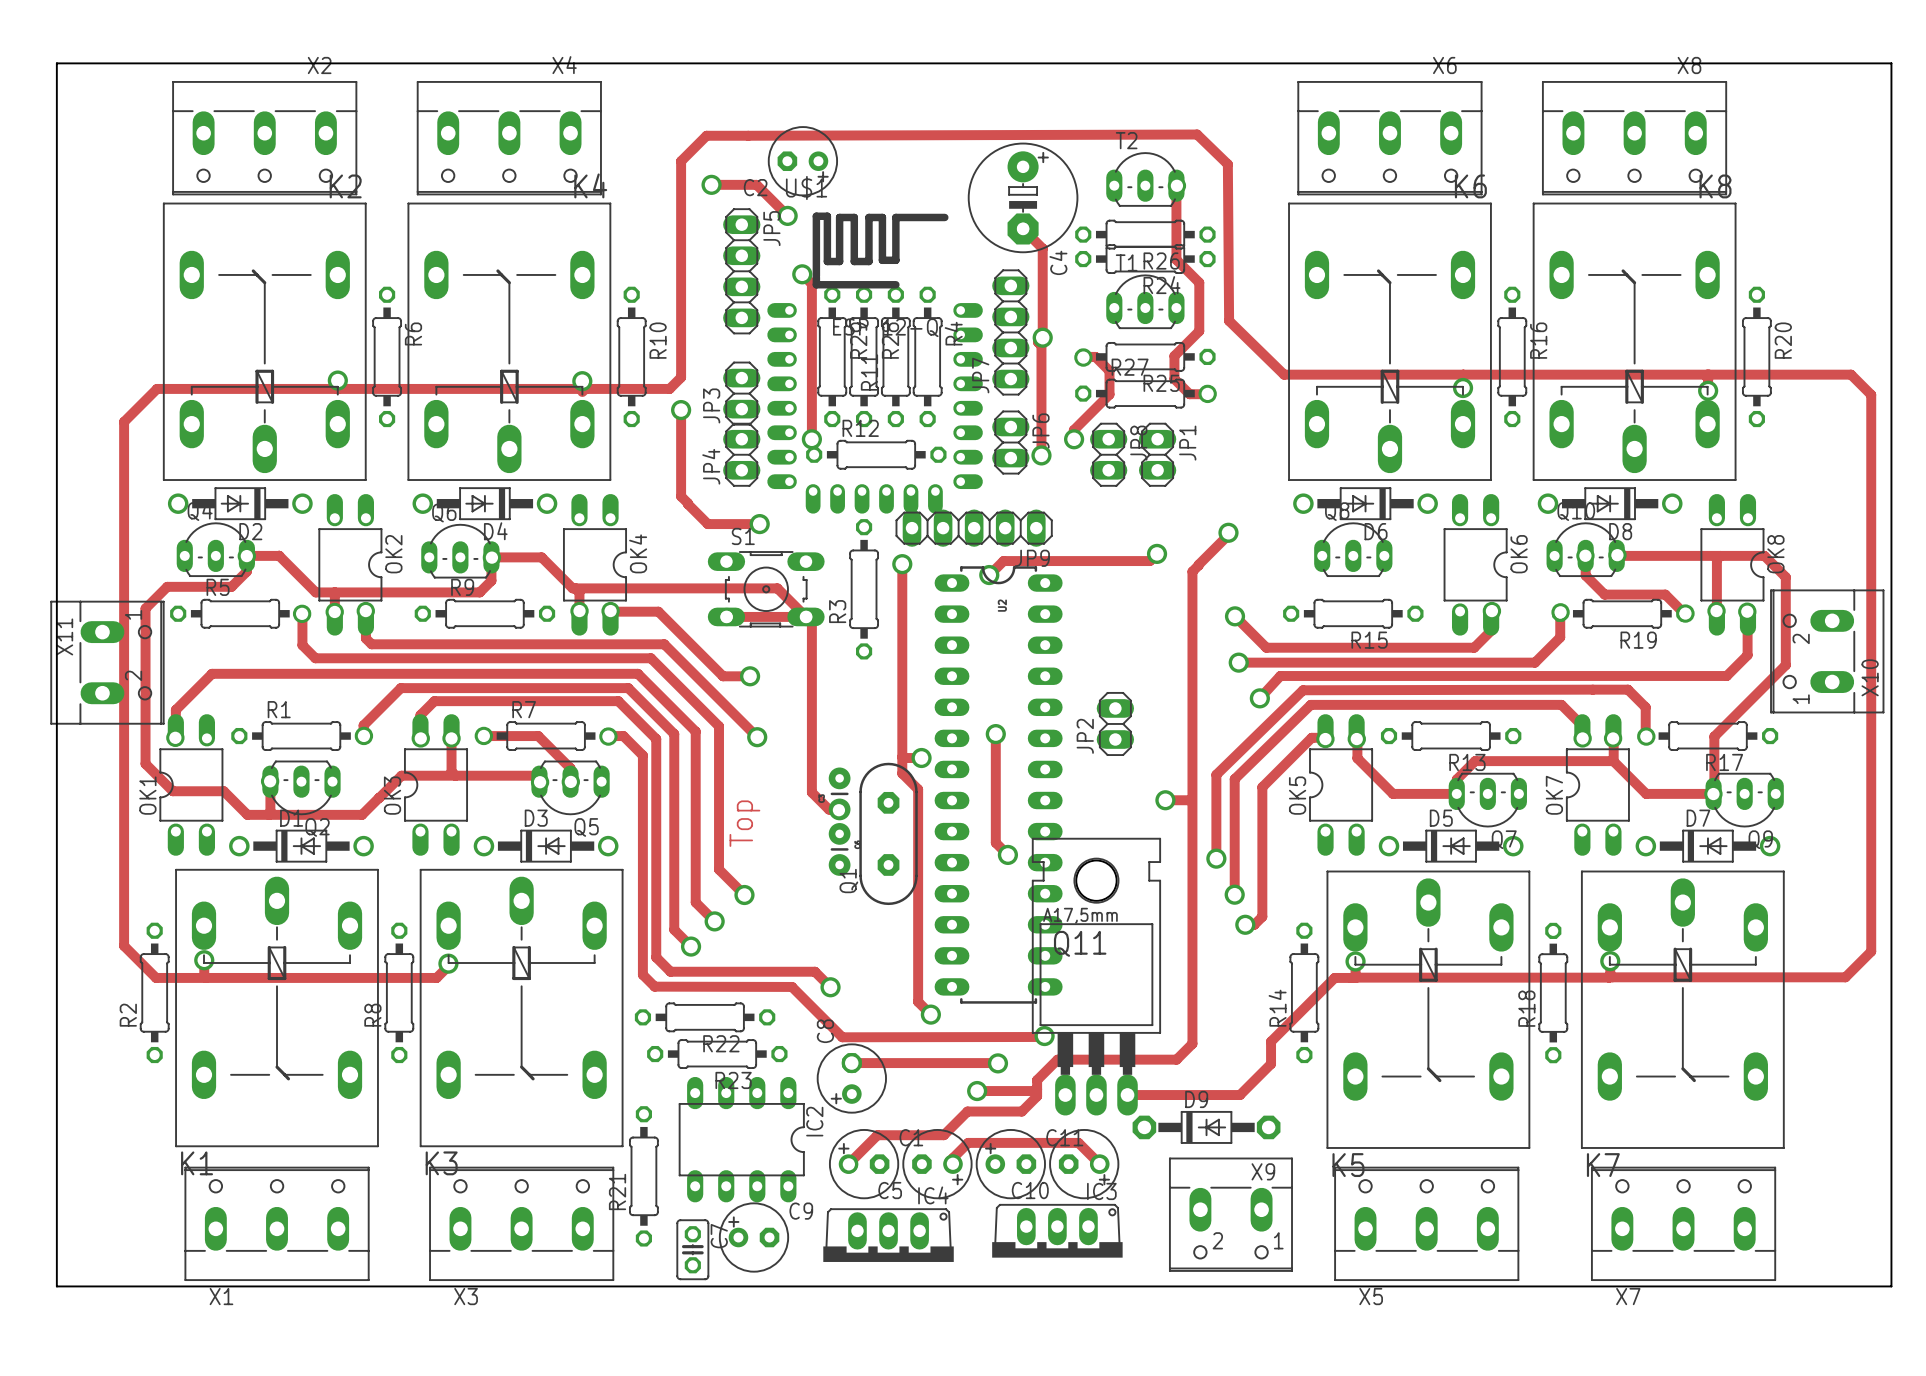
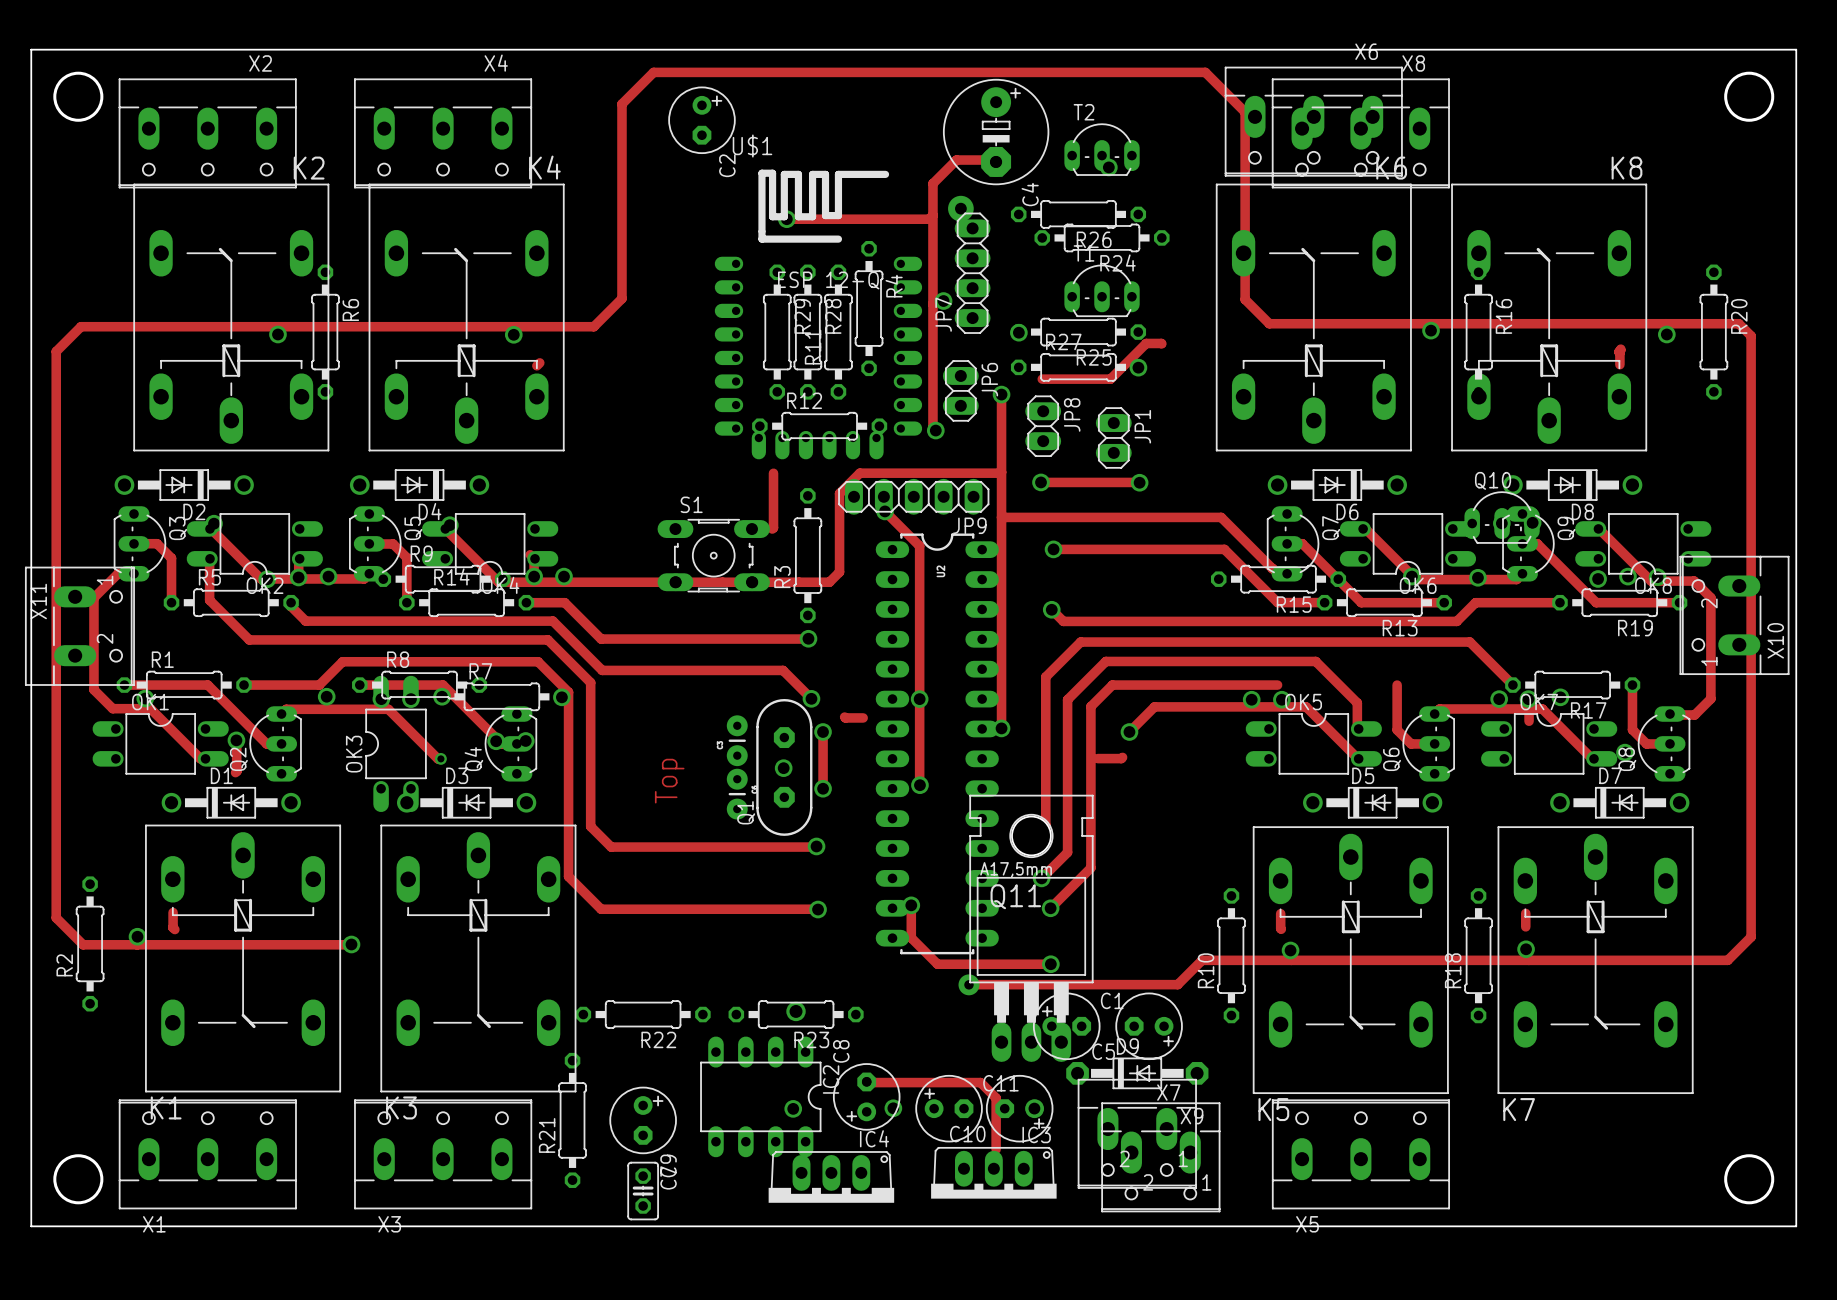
round board edge: none -> [53, 71, 104, 122]
round board edge: none -> [1724, 71, 1775, 122]
X2 position: (264, 138) -> (207, 133)
X4 position: (509, 138) -> (443, 133)
X8 position: (1634, 138) -> (1360, 133)
C2 rotation: 0° (802, 161) -> 90° counterclockwise (701, 120)
C2 position: (802, 161) -> (701, 120)
T2 position: (1145, 179) -> (1102, 149)
track: none -> (996, 161) (994, 160) (956, 160) (932, 183) (932, 427) (935, 430)
track: (711, 184) (756, 184) (787, 215) -> none
via: (711, 184) -> none
track: (1176, 185) (1176, 259) (1199, 282) (1199, 331) (1174, 356) (1174, 379) (1189, 394) (1207, 393) -> none
C4 position: (1023, 197) -> (996, 132)
via: (787, 215) -> none
track: (1023, 228) (1042, 248) (1042, 337) (1038, 342) (1041, 345) (1041, 455) -> none
track: none -> (932, 215) (929, 219) (786, 219)
via: none -> (786, 219)
R24 position: (1145, 259) -> (1102, 237)
JP5: (741, 271) -> none
track: (802, 274) (811, 283) (811, 439) -> none
via: (802, 274) -> none
T1 position: (1145, 301) -> (1102, 290)
via: none -> (943, 301)
JP7 position: (1010, 332) -> (972, 273)
via: (1042, 337) -> none
R10 name position: R10 (658, 340) -> R10 (1206, 970)
via: none -> (1431, 330)
R6 position: (387, 356) -> (325, 332)
R10 position: (631, 356) -> (1231, 955)
R4 position: (927, 356) -> (869, 308)
track: (1083, 356) (1095, 356) (1109, 370) (1109, 394) (1073, 430) (1074, 439) -> none
R16 position: (1512, 356) -> (1478, 332)
R20 position: (1756, 356) -> (1713, 332)
via: none -> (277, 334)
via: none -> (513, 334)
via: none -> (1666, 334)
U$1 position: (875, 363) -> (818, 314)
track: none -> (1161, 343) (1146, 343) (1110, 379) (1042, 379)
via: (337, 380) -> none
via: (582, 381) -> none
via: (1463, 388) -> none
via: (1708, 390) -> none
JP3: (741, 393) -> none
track: (681, 410) (681, 496) (707, 524) (759, 524) -> none
via: (681, 410) -> none
track: none -> (1001, 394) (1001, 728)
via: none -> (1001, 394)
via: (811, 439) -> none
via: (1074, 439) -> none
JP6 position: (1010, 442) -> (960, 390)
JP4: (741, 454) -> none
JP1 position: (1157, 454) -> (1113, 437)
via: (1041, 455) -> none
via: none -> (935, 430)
track: none -> (1001, 472) (859, 473) (839, 493) (839, 572) (829, 582) (751, 582)
D2 position: (240, 503) -> (184, 485)
D4 position: (484, 503) -> (419, 485)
track: none -> (773, 473) (772, 529)
D6 position: (1365, 503) -> (1337, 485)
D8 position: (1610, 503) -> (1572, 485)
track: none -> (1041, 482) (1139, 482)
via: none -> (1041, 482)
via: none -> (1139, 482)
via: (759, 524) -> none
track: (1228, 532) (1192, 571) (1192, 1043) (1176, 1059) (1057, 1059) (1037, 1080) (1037, 1096) (1021, 1111) (967, 1111) (943, 1135) (877, 1135) (848, 1164) -> none
via: (1228, 532) -> none
track: none -> (884, 511) (919, 546) (919, 785)
via: none -> (884, 511)
Q4 rotation: 0° (215, 549) -> 90° counterclockwise (510, 743)
Q4 position: (215, 549) -> (510, 743)
track: none -> (1001, 517) (1221, 517) (1279, 575) (1287, 573)
Q8 rotation: 0° (1353, 549) -> 90° counterclockwise (1664, 743)
Q8 position: (1353, 549) -> (1664, 743)
Q6 rotation: 0° (460, 551) -> 90° counterclockwise (1428, 743)
Q6 position: (460, 551) -> (1428, 743)
track: (1157, 553) (1149, 561) (1003, 561) (989, 575) -> none
via: (1157, 553) -> none
track: (246, 555) (279, 555) -> none
track: (247, 555) (248, 555) (246, 557) (246, 571) (231, 586) (167, 586) (145, 608) (145, 763) (172, 791) (223, 791) (247, 814) (362, 814) (401, 775) (533, 775) (539, 781) -> none
track: (279, 555) (315, 592) (479, 592) (491, 580) (491, 557) (541, 557) (572, 588) (777, 588) (811, 622) (811, 792) (828, 809) (839, 809) -> none
track: (1585, 555) (1585, 575) (1604, 594) (1665, 594) (1684, 613) -> none
track: (1616, 555) (1764, 555) (1785, 577) (1785, 665) (1714, 736) (1713, 793) (1646, 793) (1613, 761) (1475, 761) (1456, 779) (1456, 793) (1393, 793) (1357, 758) (1356, 738) -> none
track: (1720, 555) (1716, 559) (1716, 611) -> none
track: none -> (210, 528) (261, 578) (364, 578) (369, 573)
track: none -> (445, 528) (498, 582) (675, 582)
track: none -> (1363, 528) (1365, 528) (1416, 579) (1516, 579) (1522, 573)
track: none -> (1598, 529) (1651, 581) (1694, 581) (1710, 597) (1710, 698) (1694, 714) (1670, 714)
OK2 rotation: 0° (350, 564) -> 90° clockwise (254, 543)
OK4 rotation: 0° (595, 564) -> 90° clockwise (490, 543)
track: (902, 564) (902, 773) (918, 789) (918, 1001) (930, 1014) -> none
via: (902, 564) -> none
OK6 rotation: 0° (1475, 564) -> 90° clockwise (1407, 543)
OK8 rotation: 0° (1732, 564) -> 90° clockwise (1643, 543)
via: (989, 575) -> none
track: none -> (134, 543) (157, 543) (171, 558) (171, 602)
track: none -> (1287, 543) (1302, 543) (1361, 602) (1444, 602)
track: none -> (1522, 543) (1537, 543) (1596, 602) (1679, 602)
Q3: none -> (139, 543)
track: none -> (369, 544) (393, 544) (406, 557) (406, 602)
track: none -> (1053, 549) (1224, 549) (1277, 602) (1324, 602)
via: none -> (1053, 549)
track: none -> (210, 558) (209, 600) (249, 639) (547, 639) (590, 682) (590, 826) (611, 847) (816, 846)
track: none -> (133, 573) (118, 573) (93, 597) (93, 689) (112, 708) (150, 708) (200, 758) (205, 758)
track: (365, 611) (365, 638) (371, 644) (664, 644) (757, 737) -> none
track: (610, 611) (658, 611) (723, 676) (750, 676) -> none
track: (1491, 611) (1491, 630) (1474, 647) (1266, 647) (1235, 616) -> none
track: (1747, 611) (1747, 655) (1726, 675) (1280, 675) (1259, 698) -> none
R5 position: (240, 613) -> (231, 602)
track: (302, 613) (302, 645) (315, 658) (650, 658) (719, 726) (719, 869) (744, 895) -> none
track: (1560, 613) (1560, 637) (1535, 662) (1238, 662) -> none
R19 position: (1622, 613) -> (1619, 602)
via: (1235, 616) -> none
track: none -> (291, 602) (291, 606) (305, 621) (552, 621) (602, 670) (783, 670) (811, 698)
track: none -> (526, 602) (564, 602) (601, 639) (808, 638)
track: none -> (1559, 602) (1475, 602) (1456, 621) (1063, 621) (1051, 609)
via: none -> (1051, 609)
via: (1238, 662) -> none
via: none -> (808, 638)
via: (750, 676) -> none
via: (1259, 698) -> none
track: none -> (124, 685) (207, 685) (266, 743) (281, 743)
track: none -> (244, 685) (319, 685) (342, 661) (538, 661) (568, 692) (568, 876) (601, 909) (818, 909)
track: none -> (359, 685) (443, 685) (501, 743) (516, 743)
JP2: (1115, 723) -> none
track: none -> (1277, 685) (1112, 685) (1090, 706) (1090, 867) (1050, 908)
track: none -> (1397, 685) (1397, 729) (1411, 743) (1434, 743)
track: none -> (1512, 685) (1469, 642) (1080, 642) (1045, 677) (1045, 824) (1022, 848)
track: none -> (1632, 685) (1632, 729) (1646, 743) (1669, 743)
track: (995, 734) (995, 842) (1007, 854) -> none
via: (995, 734) -> none
track: (1645, 735) (1645, 707) (1627, 689) (1303, 690) (1216, 774) (1216, 858) -> none
R1 position: (301, 736) -> (184, 685)
track: (363, 736) (363, 725) (400, 688) (628, 688) (674, 734) (674, 929) (691, 946) -> none
track: (483, 736) (538, 736) (570, 768) (570, 781) -> none
track: (608, 736) (623, 736) (642, 755) (642, 974) (654, 986) (792, 986) (842, 1037) (1044, 1036) -> none
R13 position: (1451, 736) -> (1384, 602)
R17 position: (1707, 736) -> (1572, 685)
via: (757, 737) -> none
track: (175, 738) (175, 709) (212, 673) (637, 673) (695, 731) (695, 902) (714, 921) -> none
track: (420, 738) (420, 715) (434, 701) (618, 701) (656, 739) (656, 957) (670, 971) (815, 971) (830, 987) -> none
track: (451, 738) (451, 771) (455, 775) -> none
via: none -> (811, 698)
via: none -> (919, 699)
track: (1325, 738) (1311, 737) (1262, 787) (1262, 916) (1254, 924) (1245, 924) -> none
track: (1582, 738) (1582, 726) (1561, 704) (1310, 704) (1234, 779) (1234, 894) -> none
track: none -> (281, 714) (286, 709) (388, 709) (437, 758) (440, 758)
track: none -> (1434, 714) (1439, 708) (1542, 708) (1594, 758)
via: (921, 758) -> none
via: none -> (1001, 728)
track: none -> (1358, 728) (1357, 703) (1315, 661) (1105, 661) (1067, 699) (1067, 852) (1041, 878)
track: none -> (823, 732) (823, 788)
via: none -> (823, 732)
track: none -> (1129, 732) (1154, 706) (1306, 706) (1358, 758)
via: none -> (1129, 732)
OK1 rotation: 0° (191, 784) -> 90° clockwise (160, 743)
OK5 rotation: 0° (1341, 784) -> 90° clockwise (1313, 743)
OK7 rotation: 0° (1597, 784) -> 90° clockwise (1549, 743)
Q2 rotation: 0° (301, 787) -> 90° clockwise (275, 743)
Q5 rotation: 0° (570, 787) -> 90° counterclockwise (375, 543)
Q5 position: (570, 787) -> (375, 543)
part position: (839, 793) -> (737, 740)
via: none -> (440, 758)
via: (1165, 800) -> none
Q7 rotation: 0° (1487, 800) -> 90° counterclockwise (1293, 543)
Q7 position: (1487, 800) -> (1293, 543)
Q9 rotation: 0° (1744, 800) -> 90° counterclockwise (1528, 543)
Q9 position: (1744, 800) -> (1528, 543)
text position: Top (744, 823) -> Top (669, 781)
via: none -> (919, 785)
via: none -> (823, 788)
Q1 position: (888, 833) -> (784, 767)
D1 position: (301, 846) -> (231, 802)
D3 position: (546, 846) -> (466, 802)
part position: (839, 849) -> (737, 794)
via: (1007, 854) -> none
via: (1216, 858) -> none
via: none -> (816, 846)
via: (1234, 894) -> none
via: (744, 895) -> none
via: (714, 921) -> none
via: none -> (1041, 878)
via: (1245, 924) -> none
via: (691, 946) -> none
track: none -> (911, 905) (911, 937) (937, 964) (1050, 964)
via: none -> (911, 905)
via: none -> (1050, 908)
via: none -> (818, 909)
via: (204, 960) -> none
via: (1355, 961) -> none
via: (1610, 961) -> none
track: (448, 963) (448, 966) (436, 977) (156, 977) (124, 945) (124, 421) (157, 388) (669, 388) (681, 377) (681, 161) (706, 135) (1197, 134) (1227, 164) (1229, 320) (1284, 374) (1851, 374) (1871, 394) (1871, 951) (1845, 977) (1612, 977) (1610, 975) (1609, 977) -> none
via: (448, 963) -> none
track: (1355, 977) (1334, 977) (1271, 1041) (1271, 1064) (1240, 1095) (1127, 1095) -> none
track: (1609, 977) (1350, 977) -> none
via: none -> (137, 936)
via: (830, 987) -> none
R2 position: (154, 992) -> (90, 943)
R8 rotation: 0° (399, 992) -> 90° clockwise (419, 685)
R8 position: (399, 992) -> (419, 685)
R14 rotation: 0° (1304, 992) -> 90° clockwise (466, 602)
R14 position: (1304, 992) -> (466, 602)
track: none -> (351, 944) (83, 944) (56, 917) (56, 351) (81, 326) (593, 326) (621, 298) (621, 104) (653, 72) (1205, 72) (1245, 112) (1245, 299) (1269, 323) (1738, 323) (1751, 335) (1751, 937) (1727, 960) (1202, 960) (1177, 984) (969, 984)
via: none -> (351, 944)
R18 position: (1553, 993) -> (1478, 955)
via: none -> (1526, 949)
via: none -> (1290, 950)
via: none -> (1050, 964)
via: (930, 1014) -> none
R22 position: (705, 1017) -> (643, 1014)
via: none -> (968, 984)
via: (1044, 1036) -> none
R23 position: (717, 1054) -> (796, 1014)
track: (851, 1063) (997, 1063) -> none
via: (997, 1063) -> none
C8 position: (851, 1078) -> (866, 1096)
track: (1037, 1089) (1034, 1091) (977, 1091) -> none
via: (977, 1091) -> none
track: none -> (866, 1081) (865, 1080) (867, 1082) (980, 1082) (996, 1098) (996, 1149)
IC2 position: (741, 1139) -> (760, 1096)
C1 position: (864, 1164) -> (1066, 1026)
C5 position: (937, 1164) -> (1149, 1026)
track: (952, 1164) (952, 1158) (968, 1142) (1078, 1142) (1099, 1164) -> none
X7 footprint: [1590, 1166, 1777, 1282] -> [1077, 1078, 1197, 1189]
R21 position: (643, 1176) -> (572, 1120)
round board edge: none -> [53, 1154, 104, 1205]
round board edge: none -> [1724, 1154, 1775, 1205]
X1 position: (277, 1223) -> (207, 1154)
X3 position: (521, 1223) -> (443, 1154)
X5 position: (1426, 1223) -> (1360, 1154)
C9 rotation: 0° (753, 1237) -> 90° clockwise (643, 1120)
C9 position: (753, 1237) -> (643, 1120)
X7 name position: X7 (1628, 1296) -> X7 (1168, 1092)

